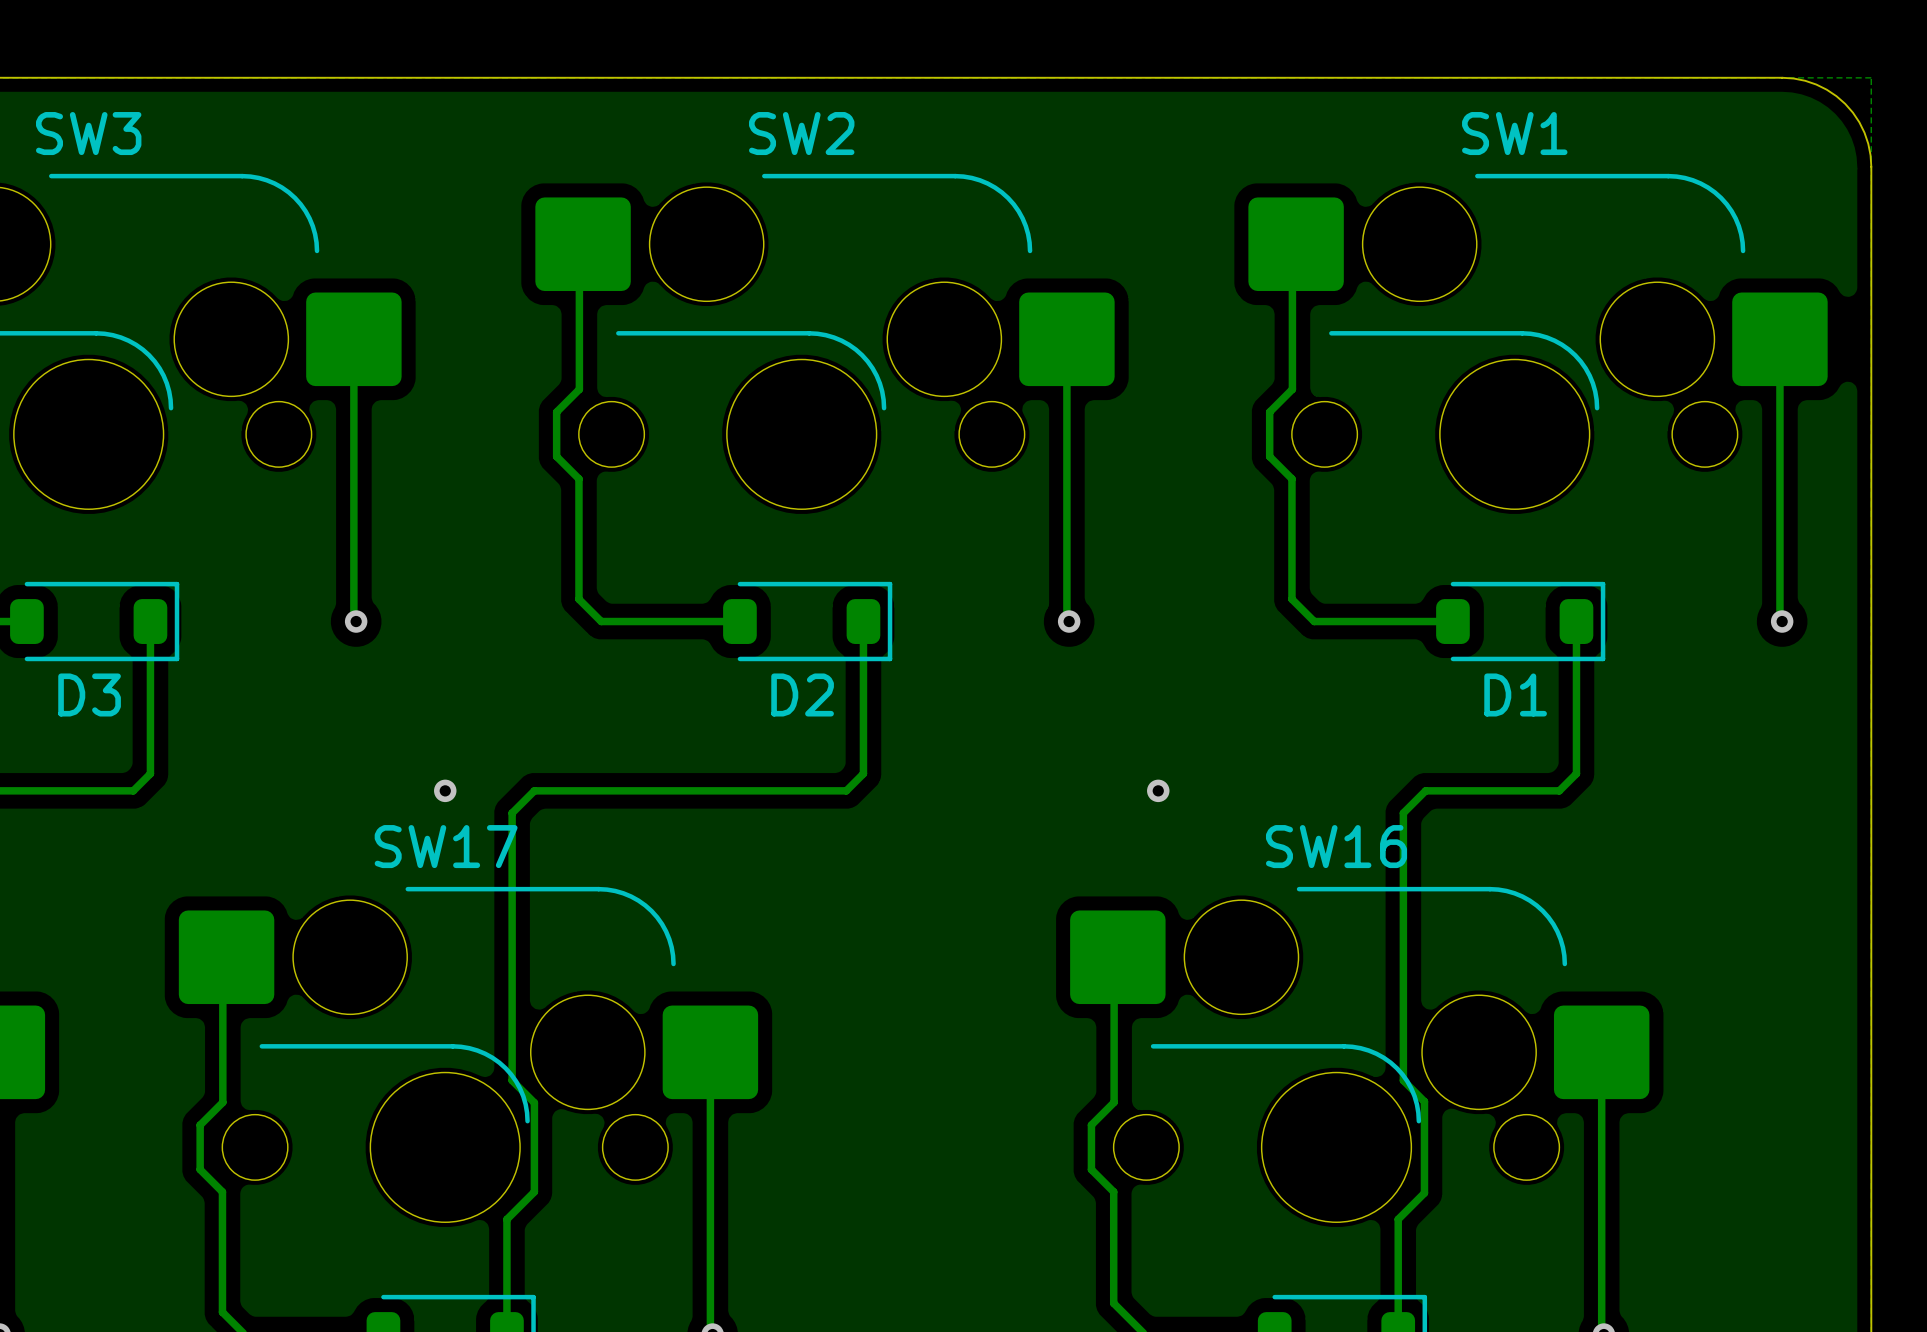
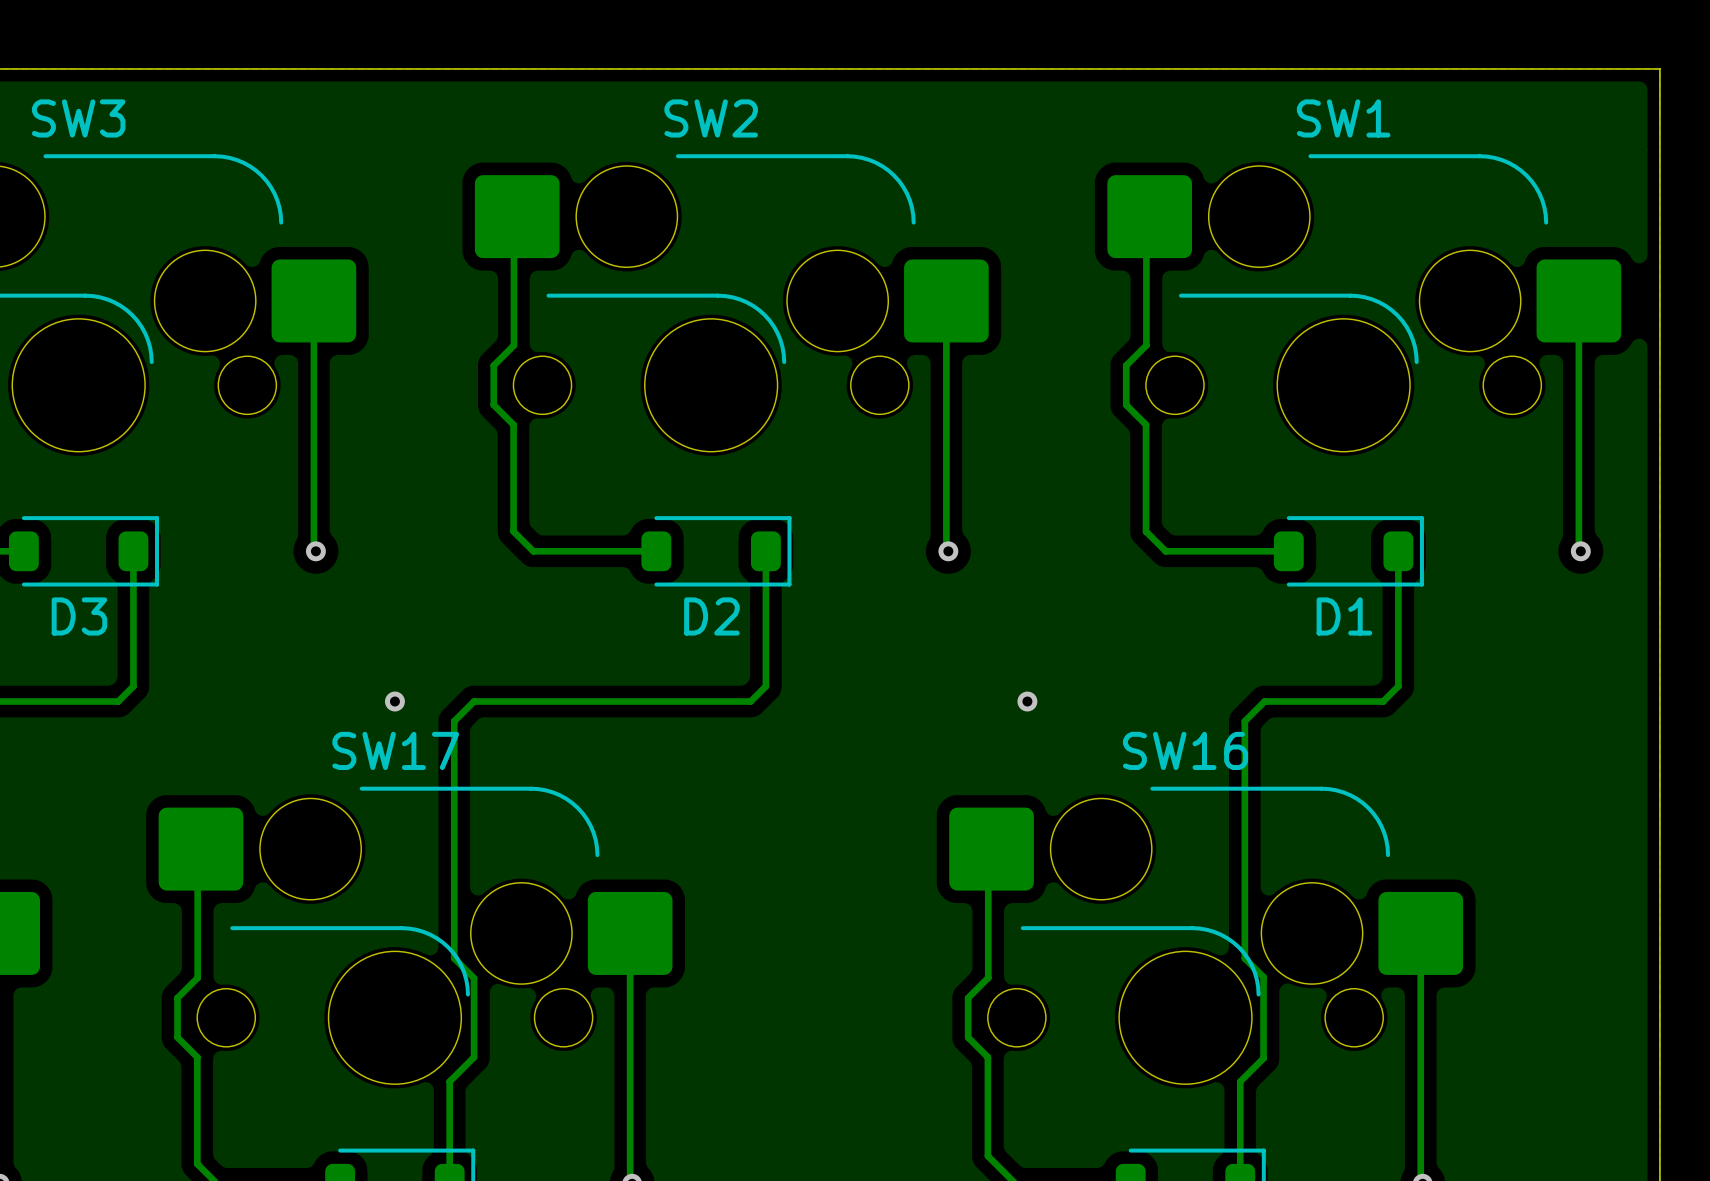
board edge: (1782, 77) (1793, 78) (1816, 84) (1826, 89) (1845, 103) (1859, 122) (1864, 132) (1868, 143) (1871, 166) -> (1580, 68) (1659, 68) (1659, 148)

